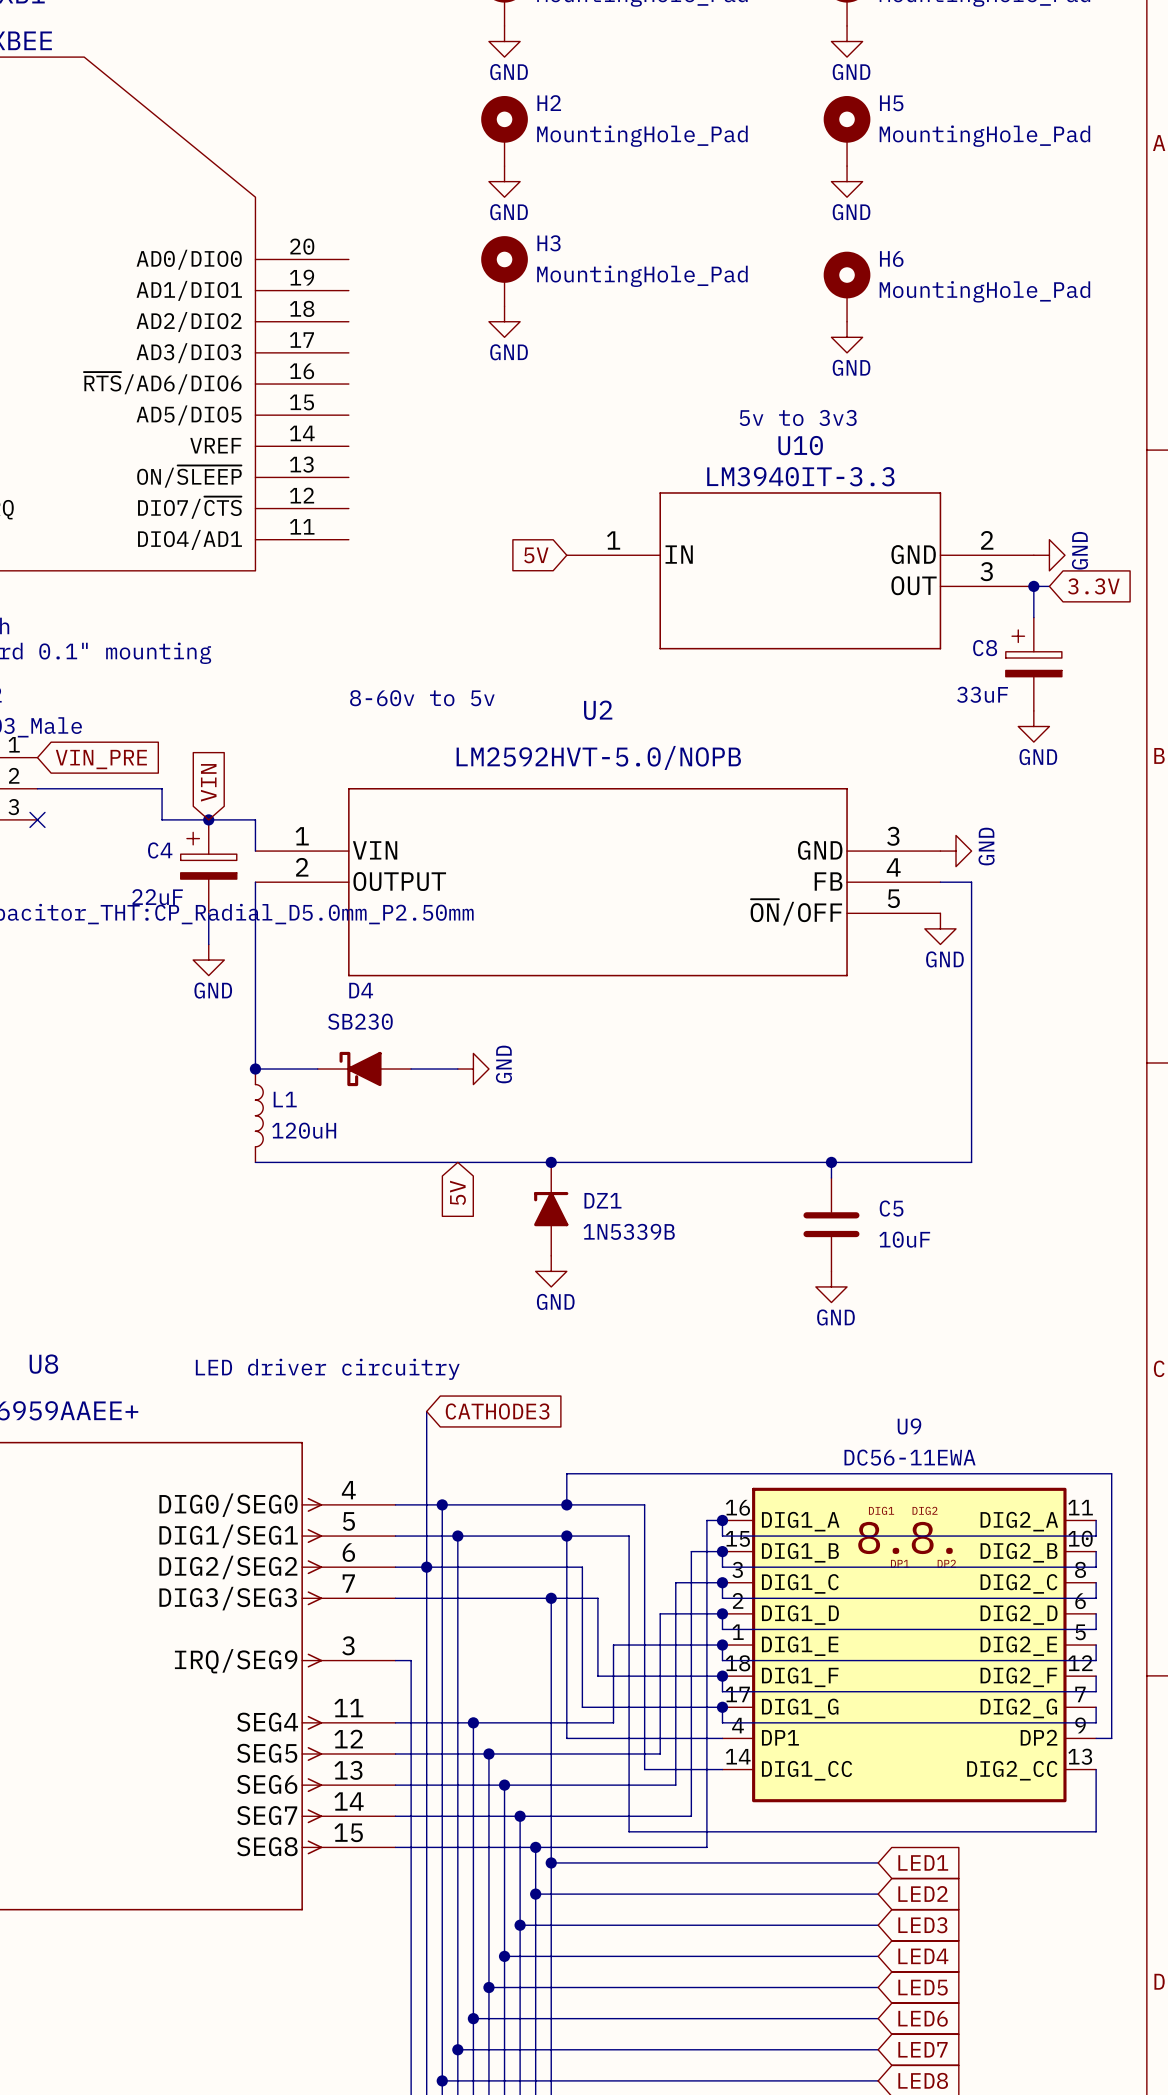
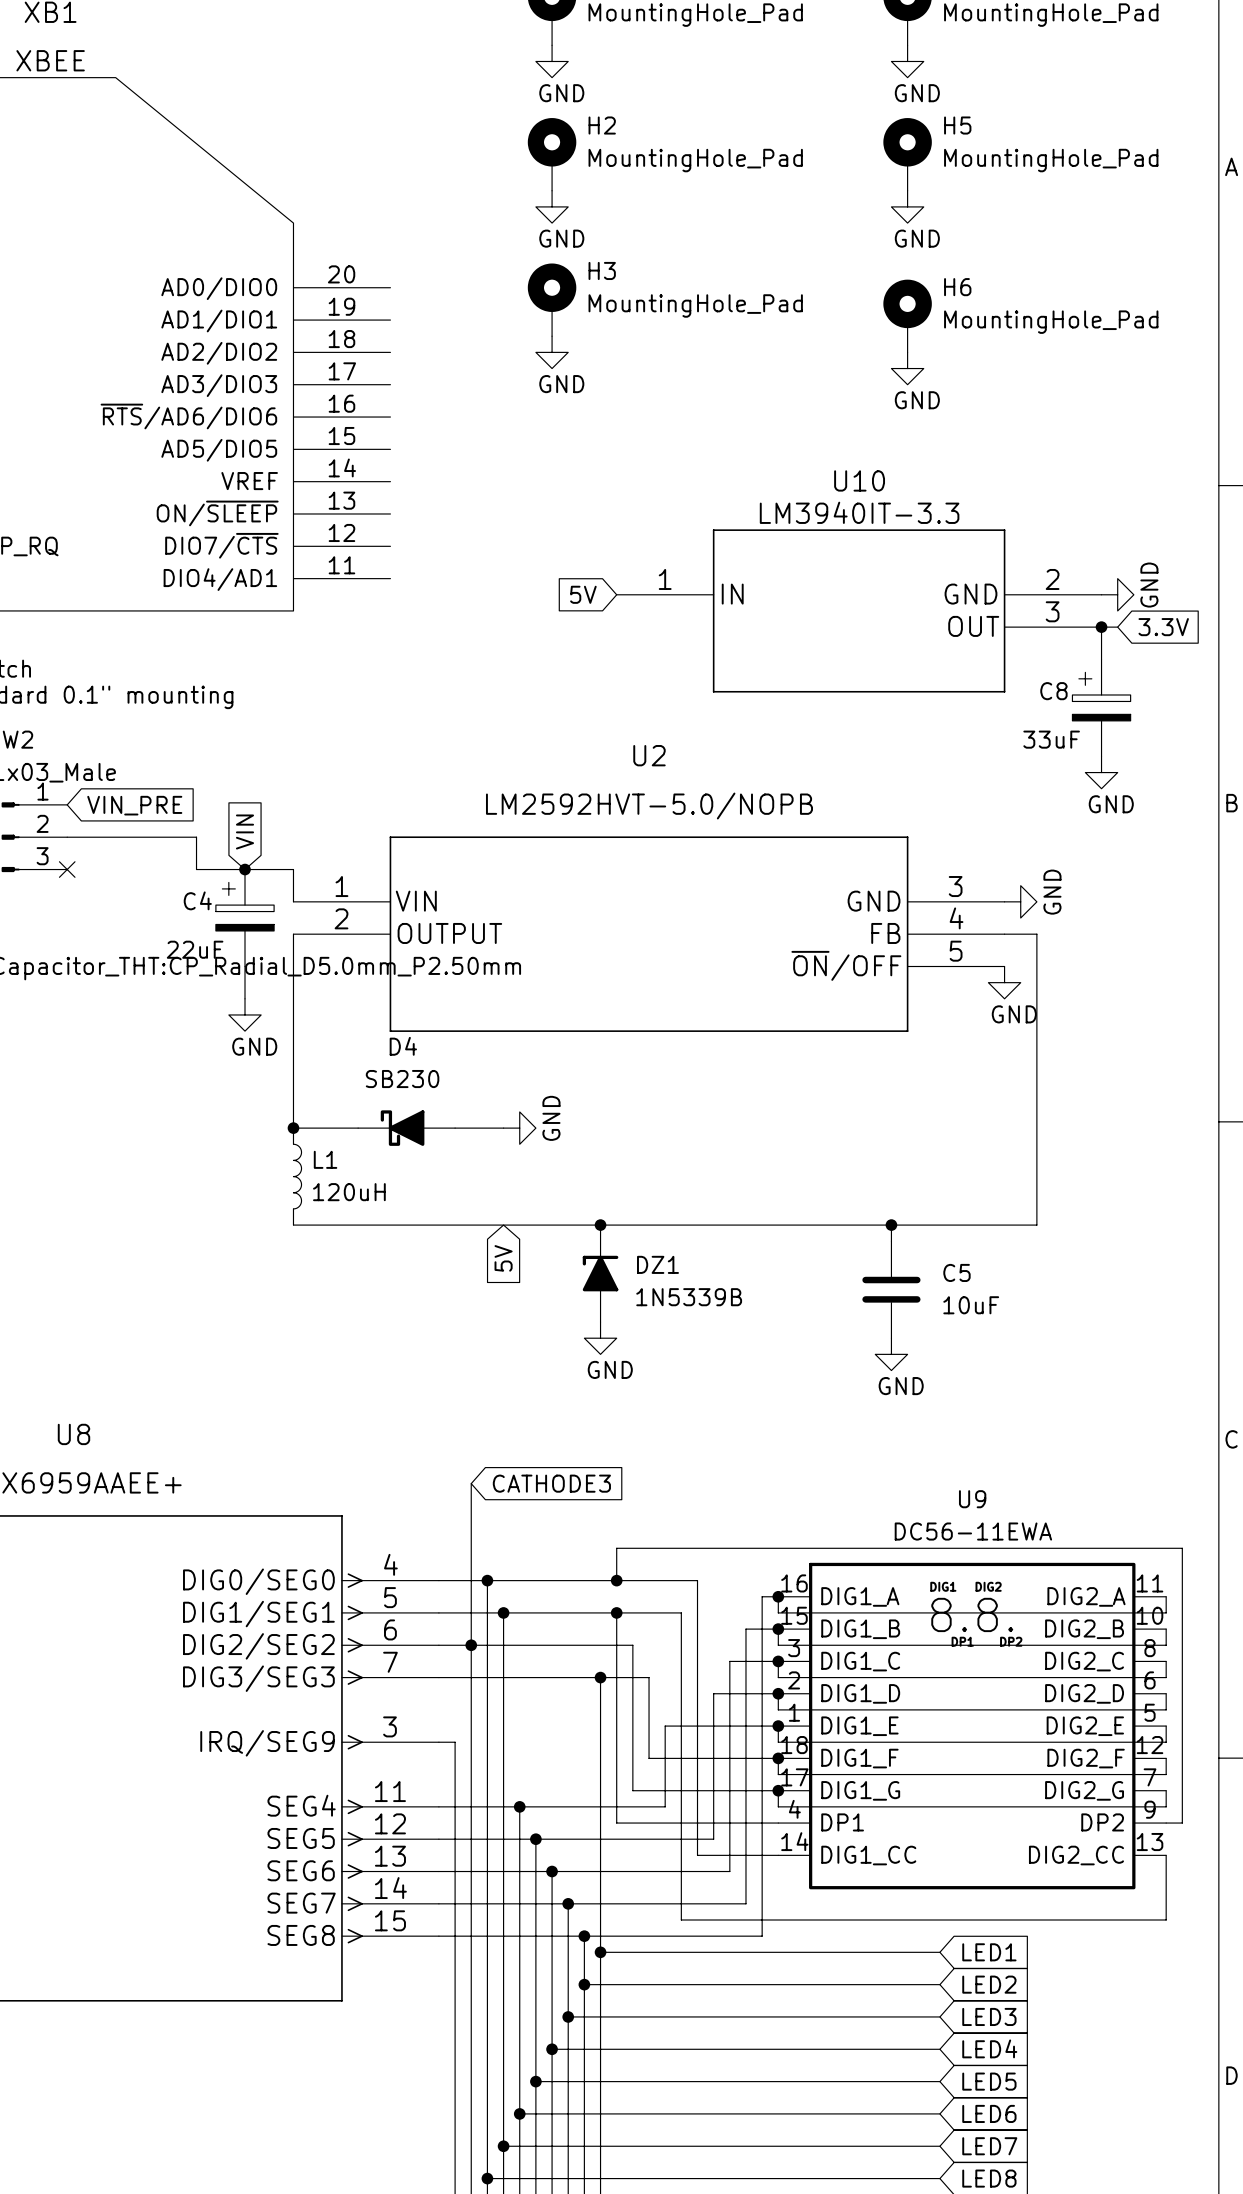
text: 5v to 3v3 (798, 417) -> none
text: 8-60v to 5v (422, 698) -> none
text: LED driver circuitry (327, 1369) -> none

